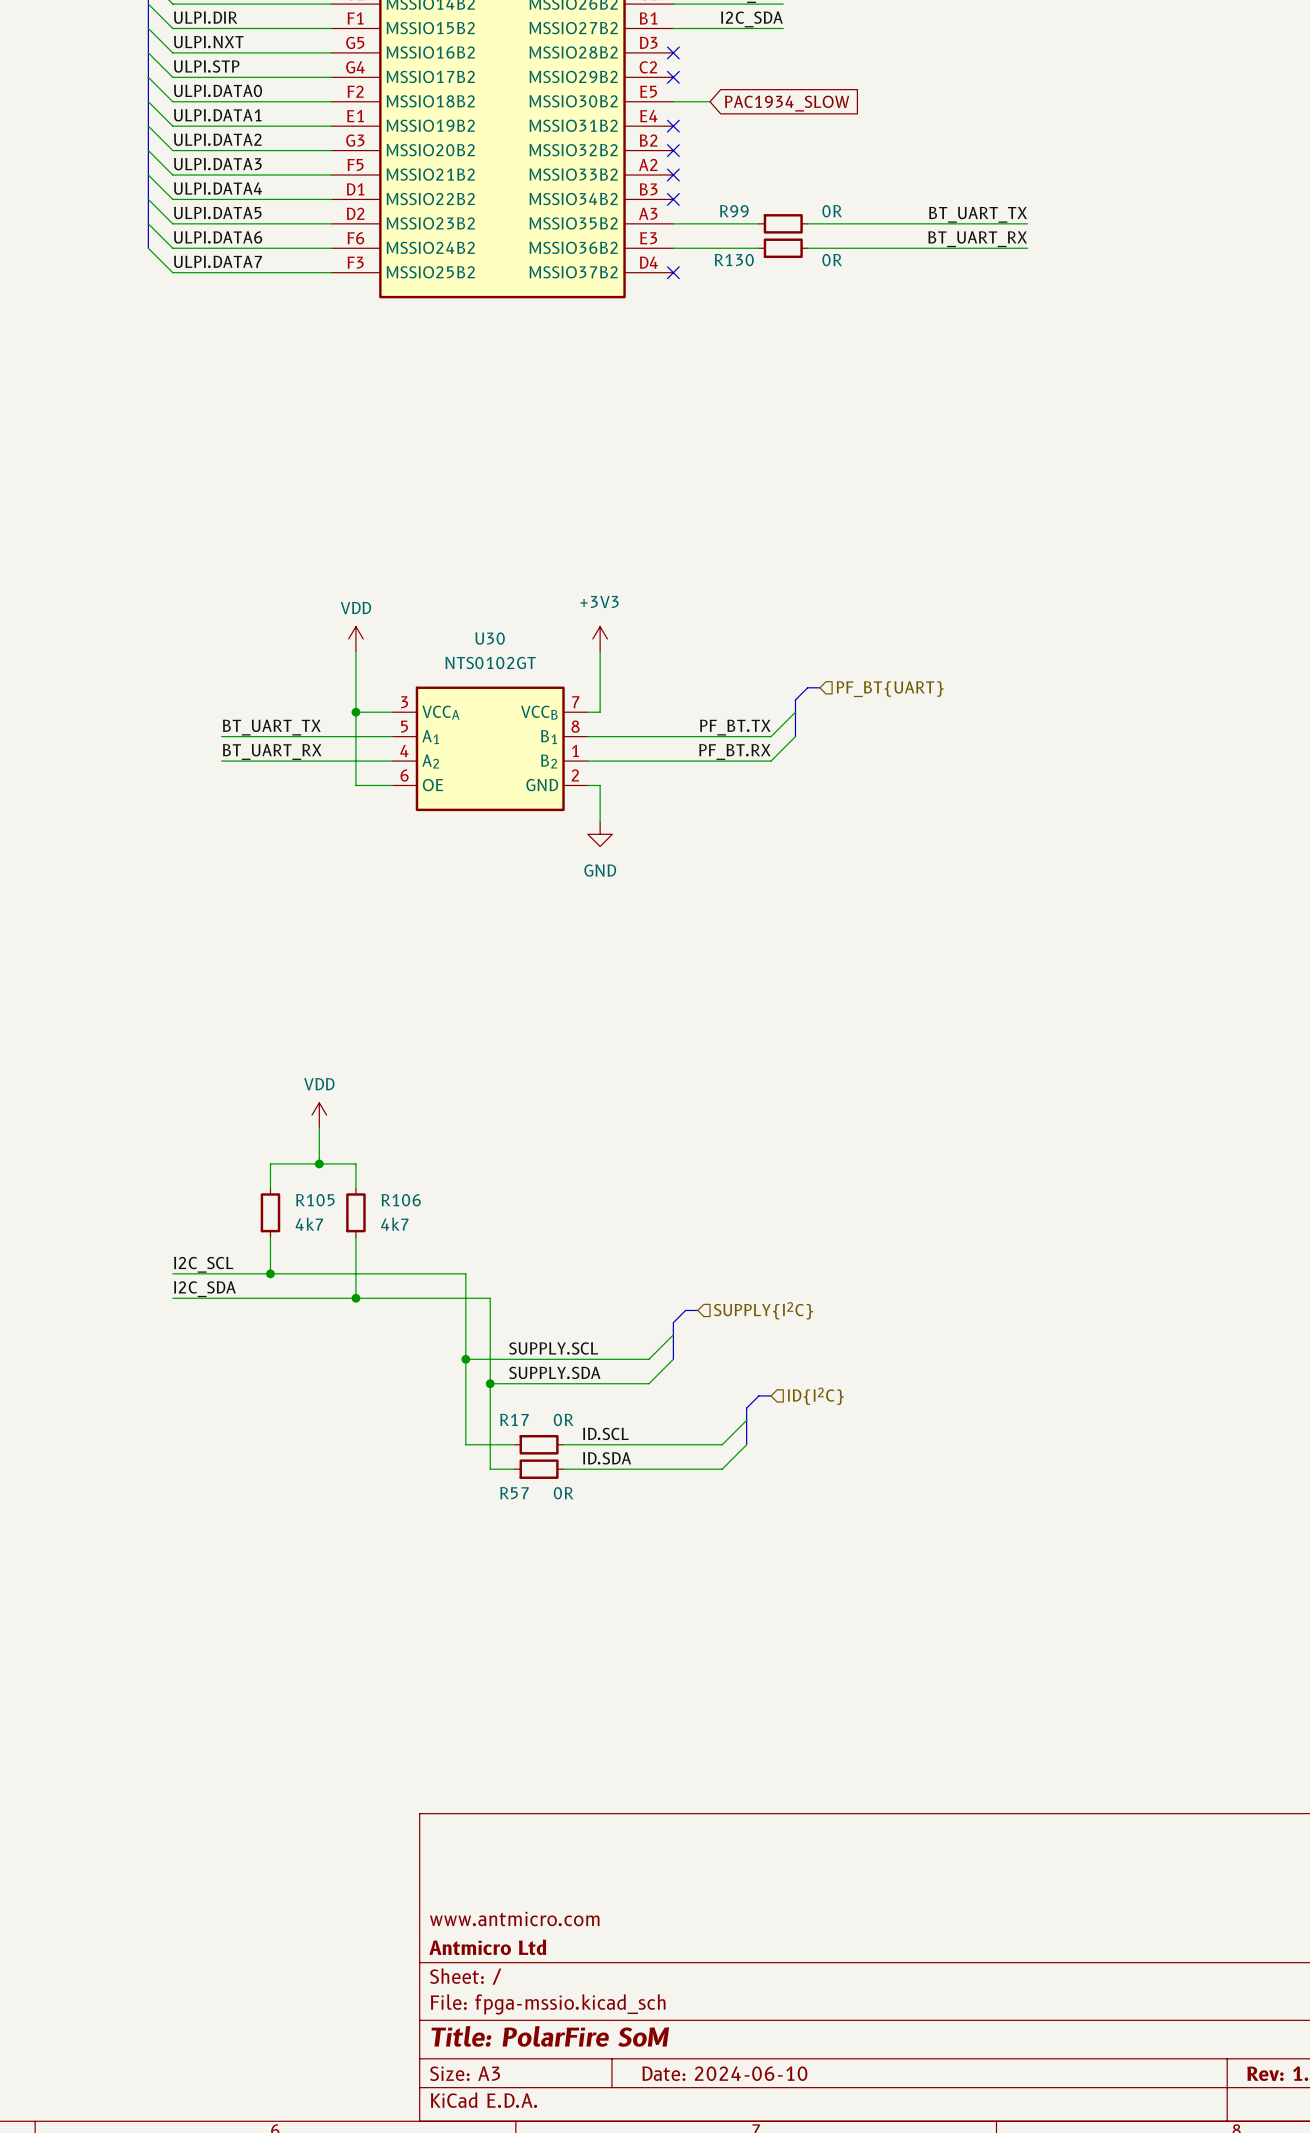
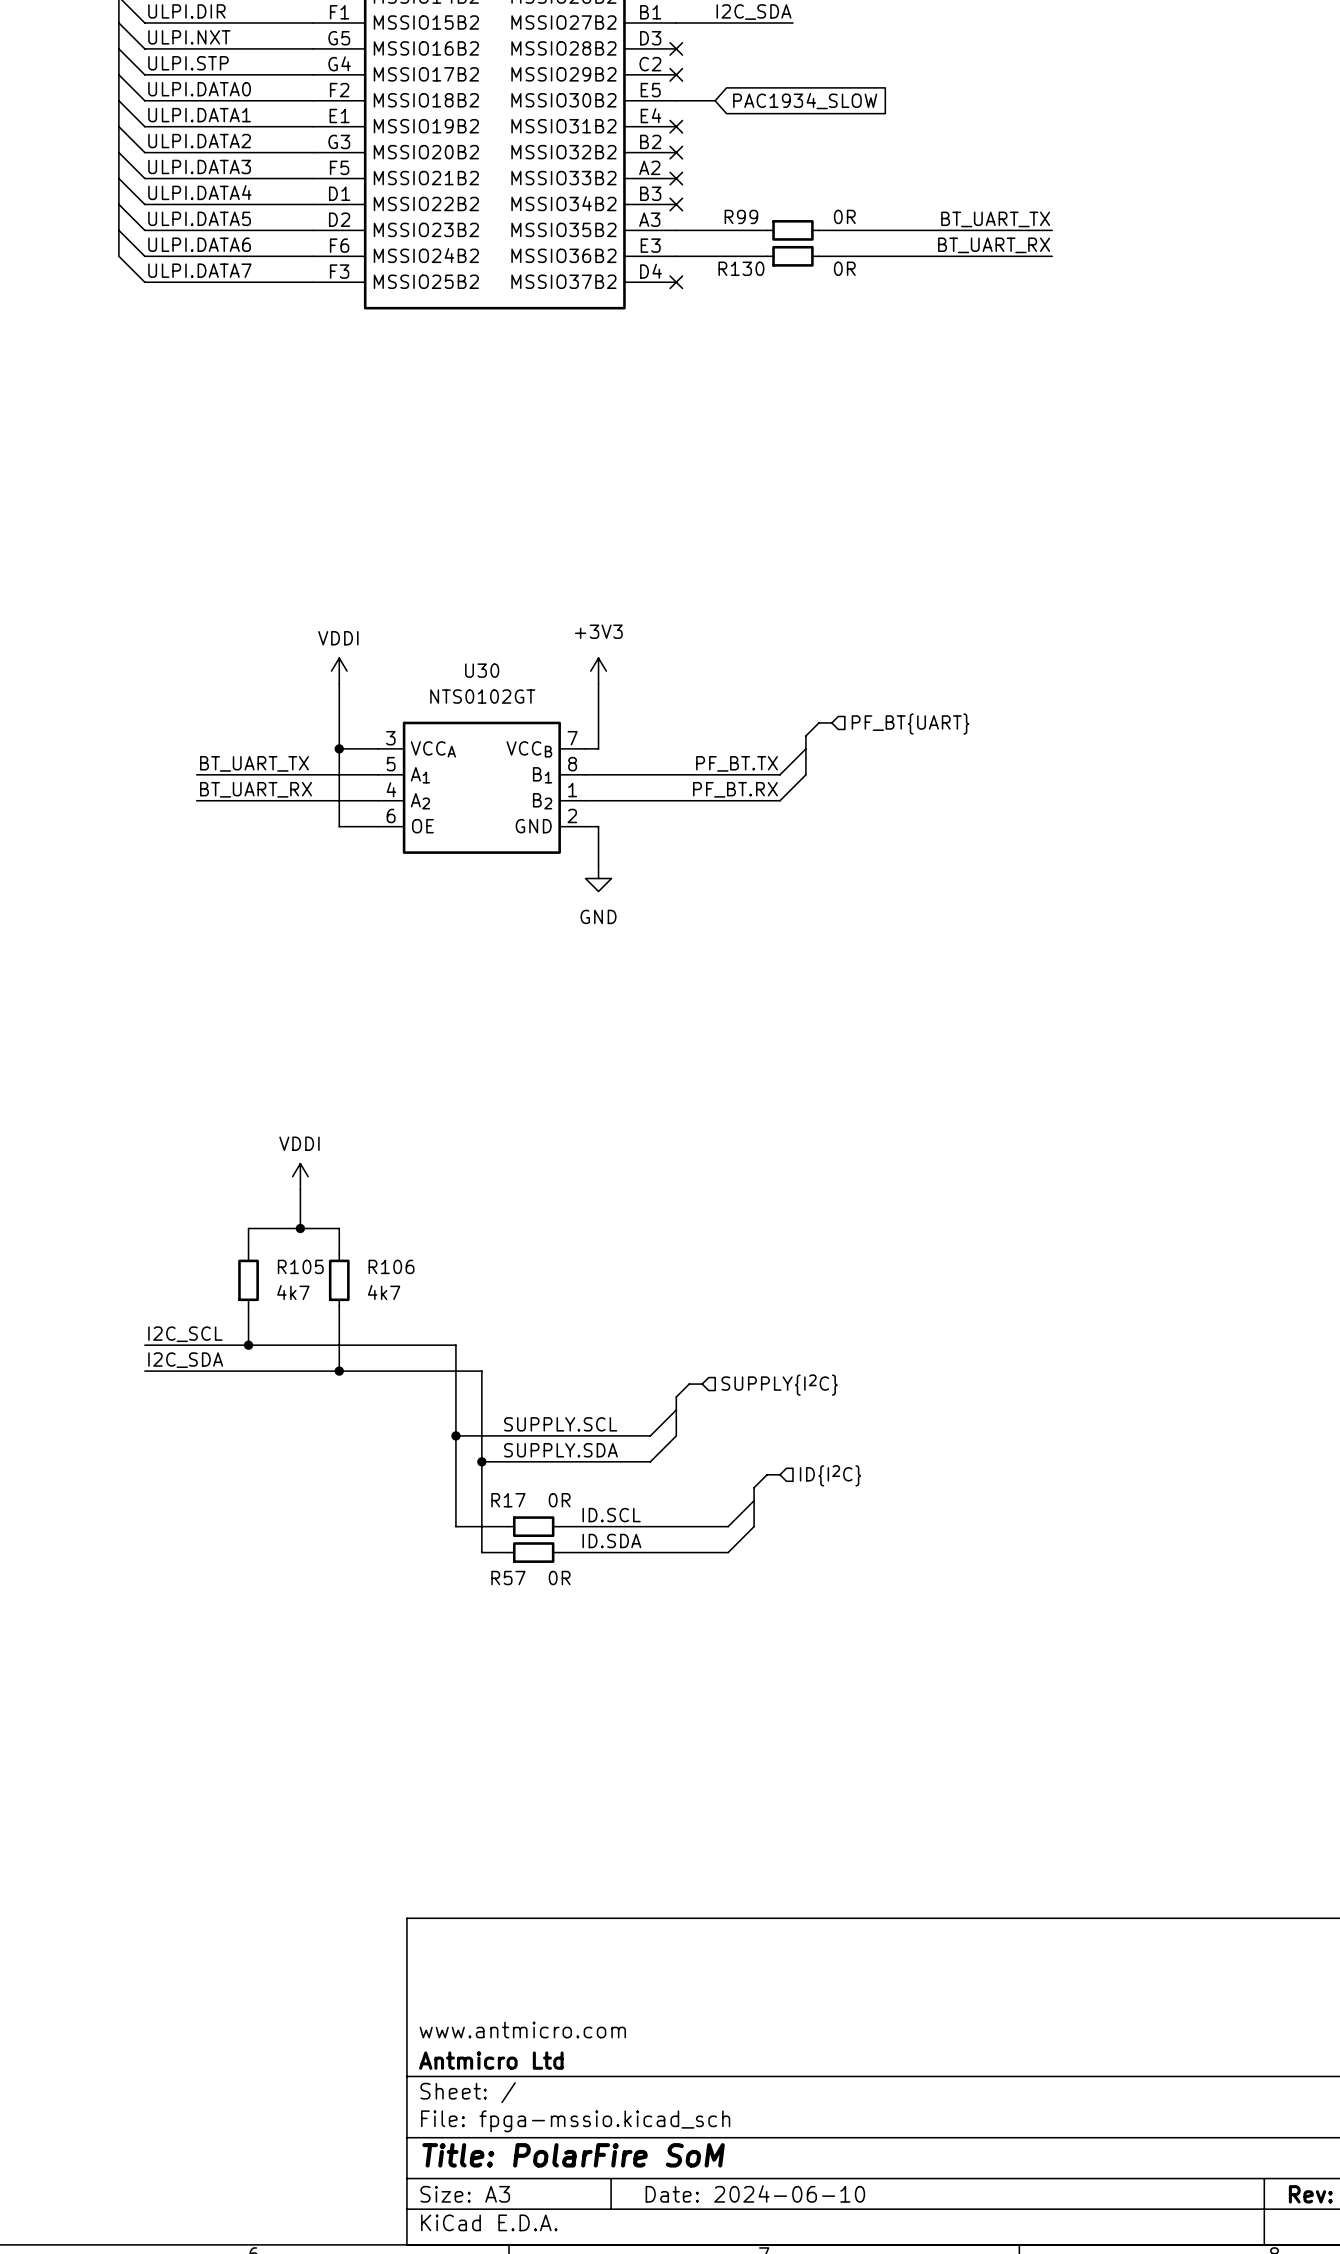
power symbol: VDD (355, 638) -> VDDI (339, 671)
power symbol: VDD (319, 1115) -> VDDI (300, 1176)

